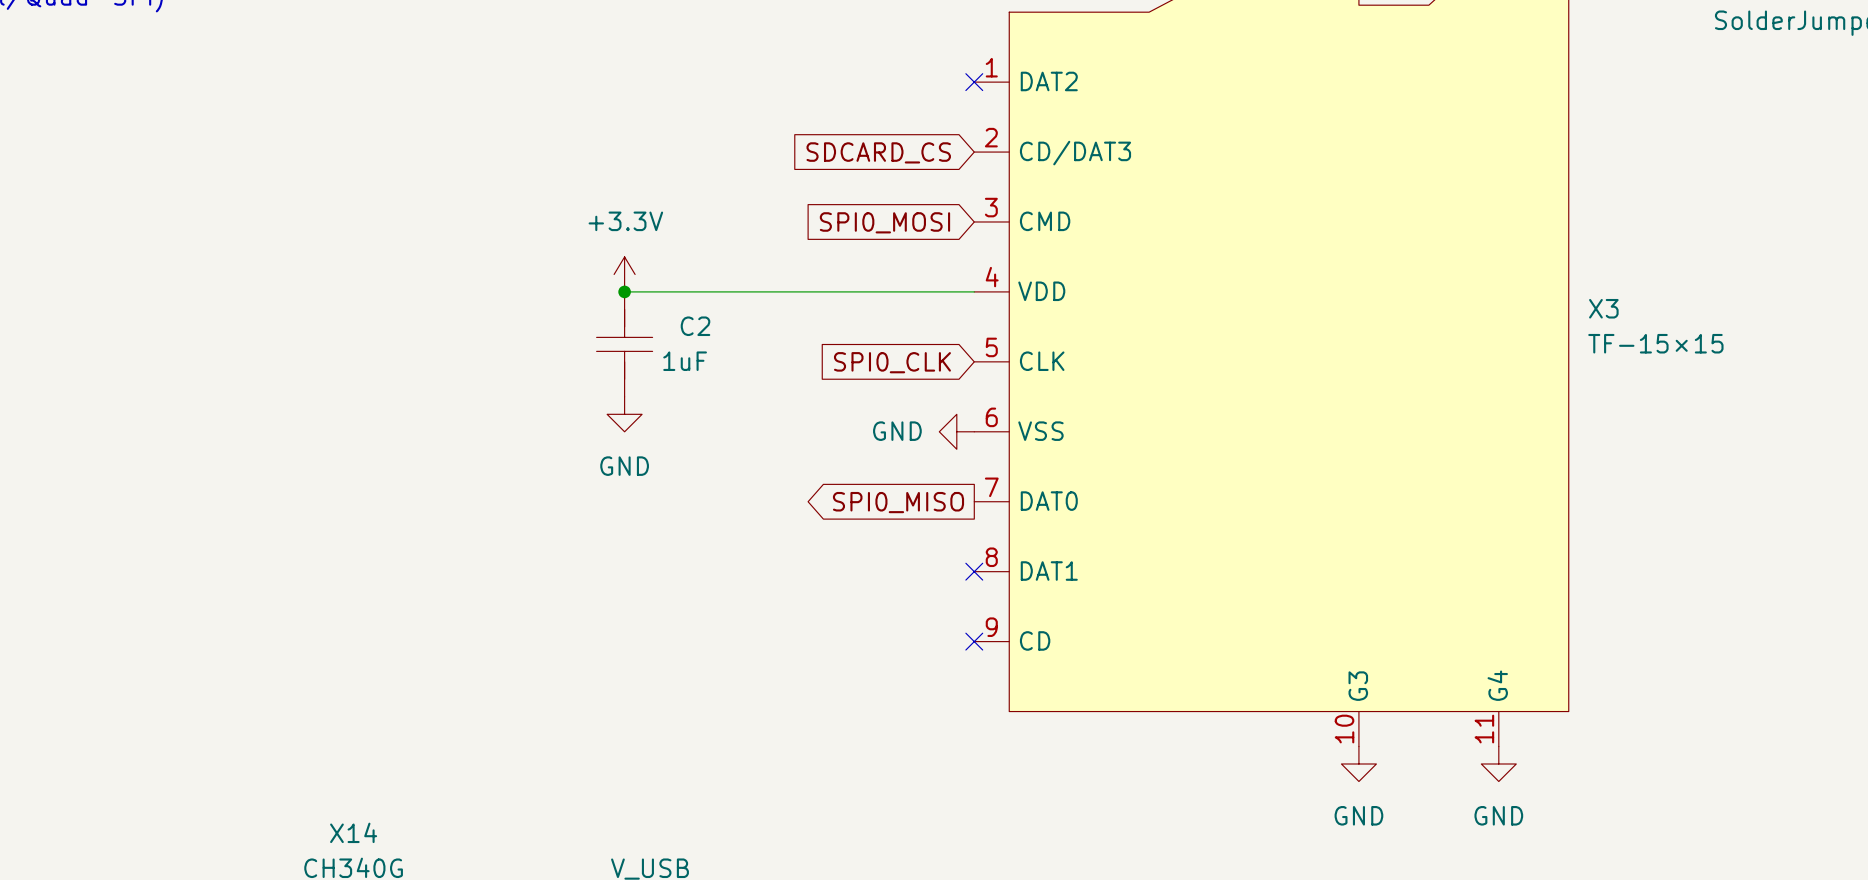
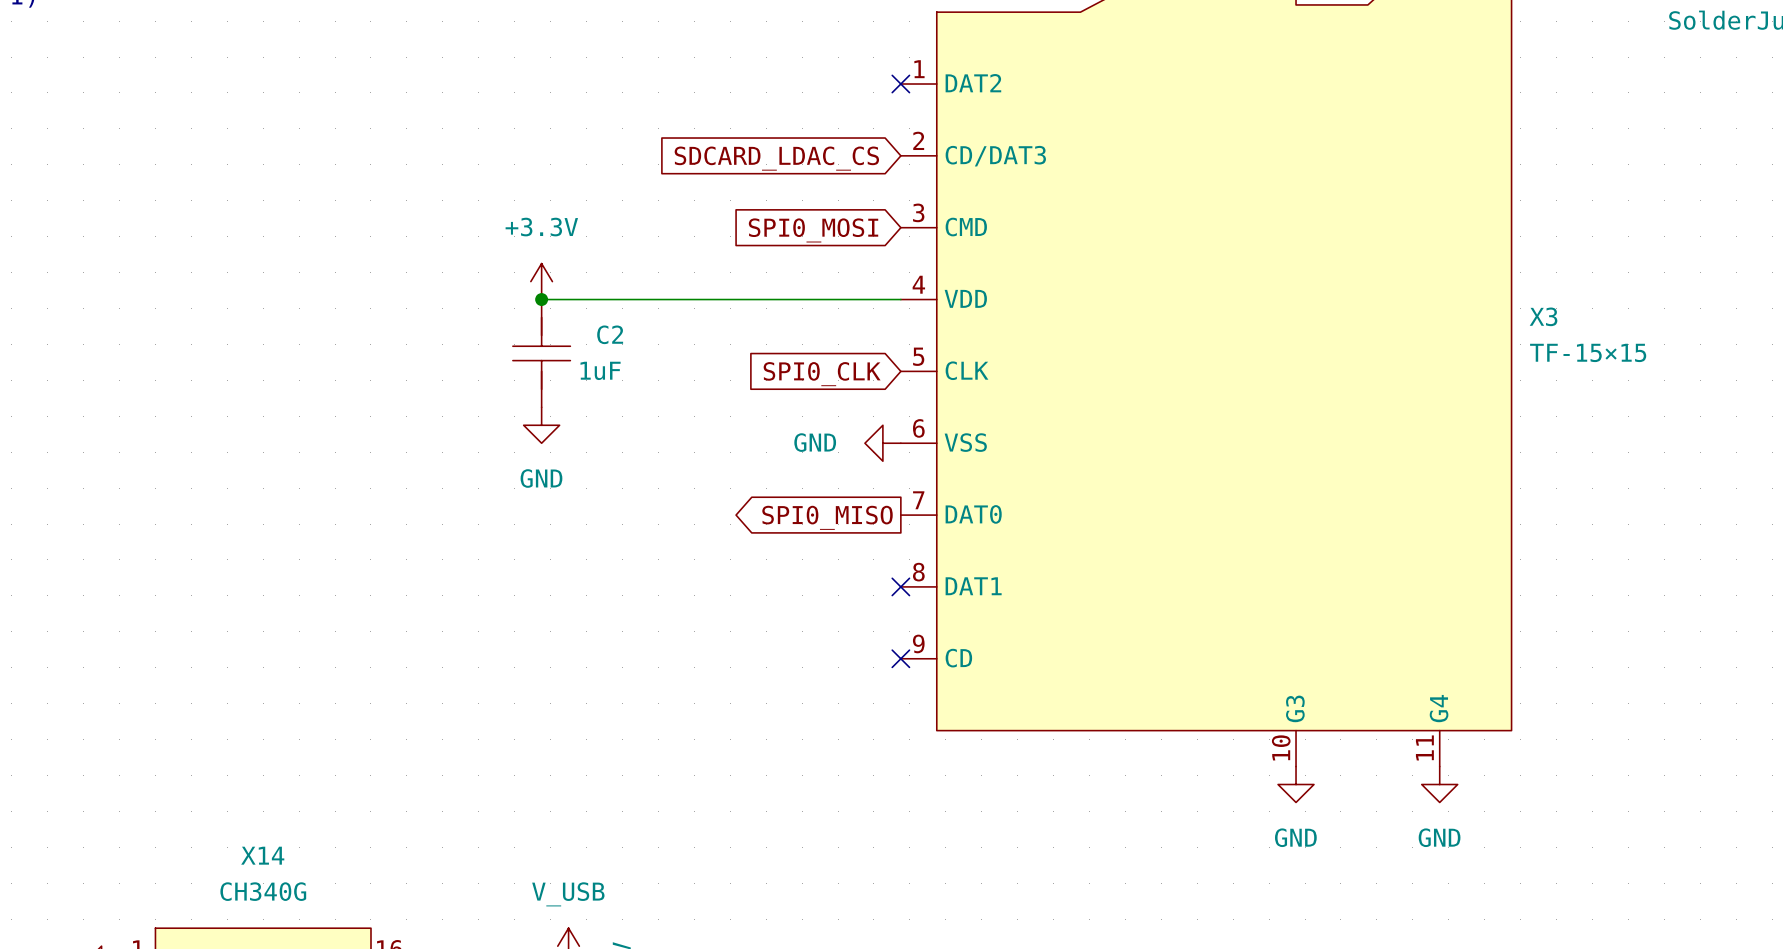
global label: SDCARD_CS (878, 152) -> SDCARD_LDAC_CS (776, 158)

